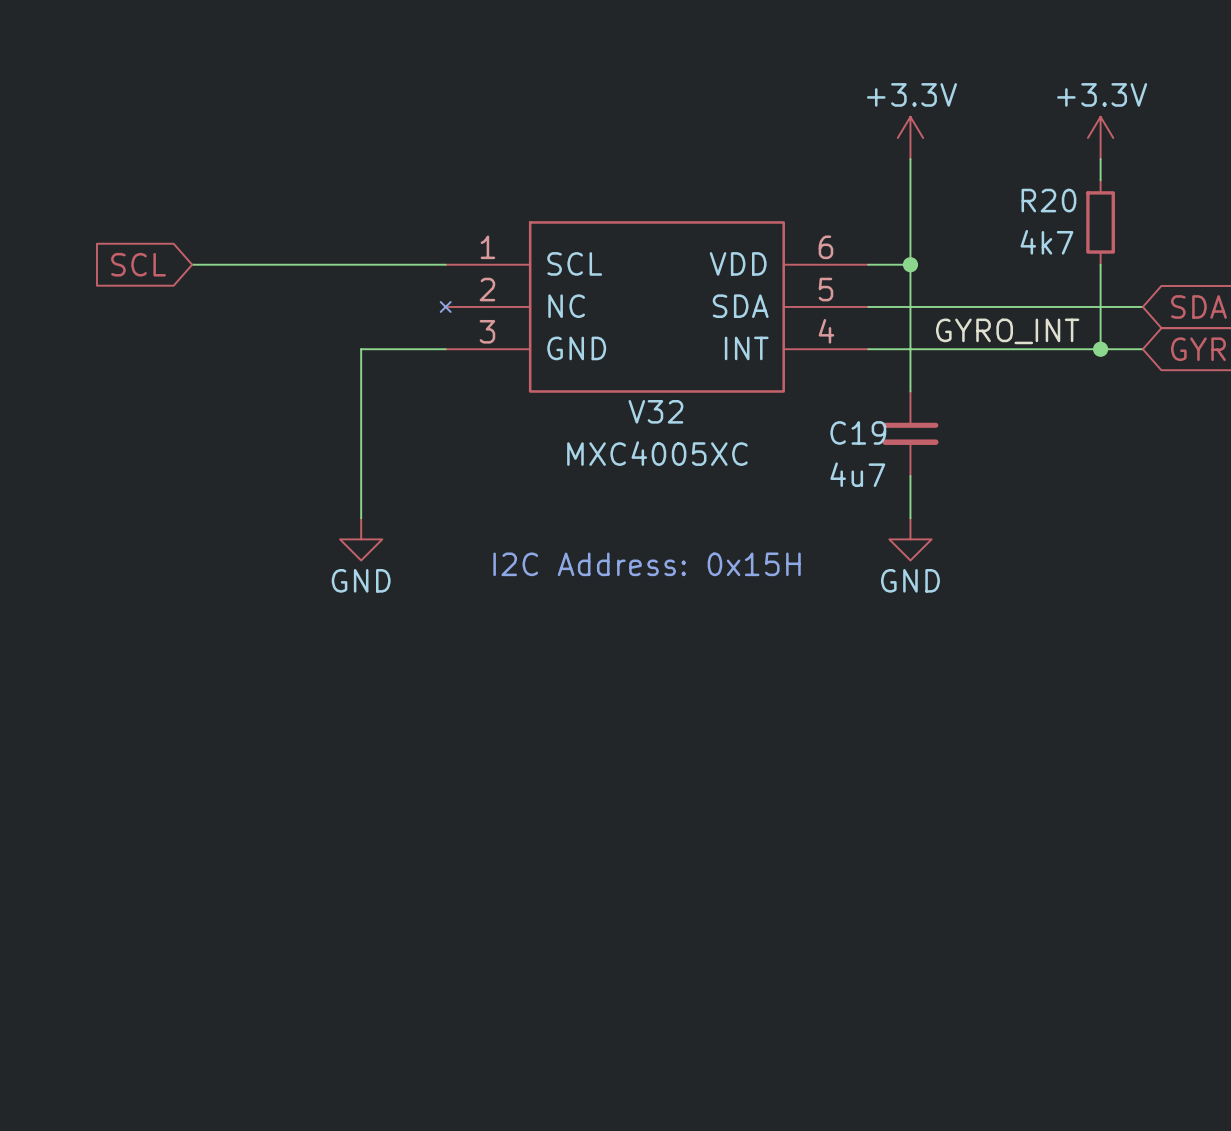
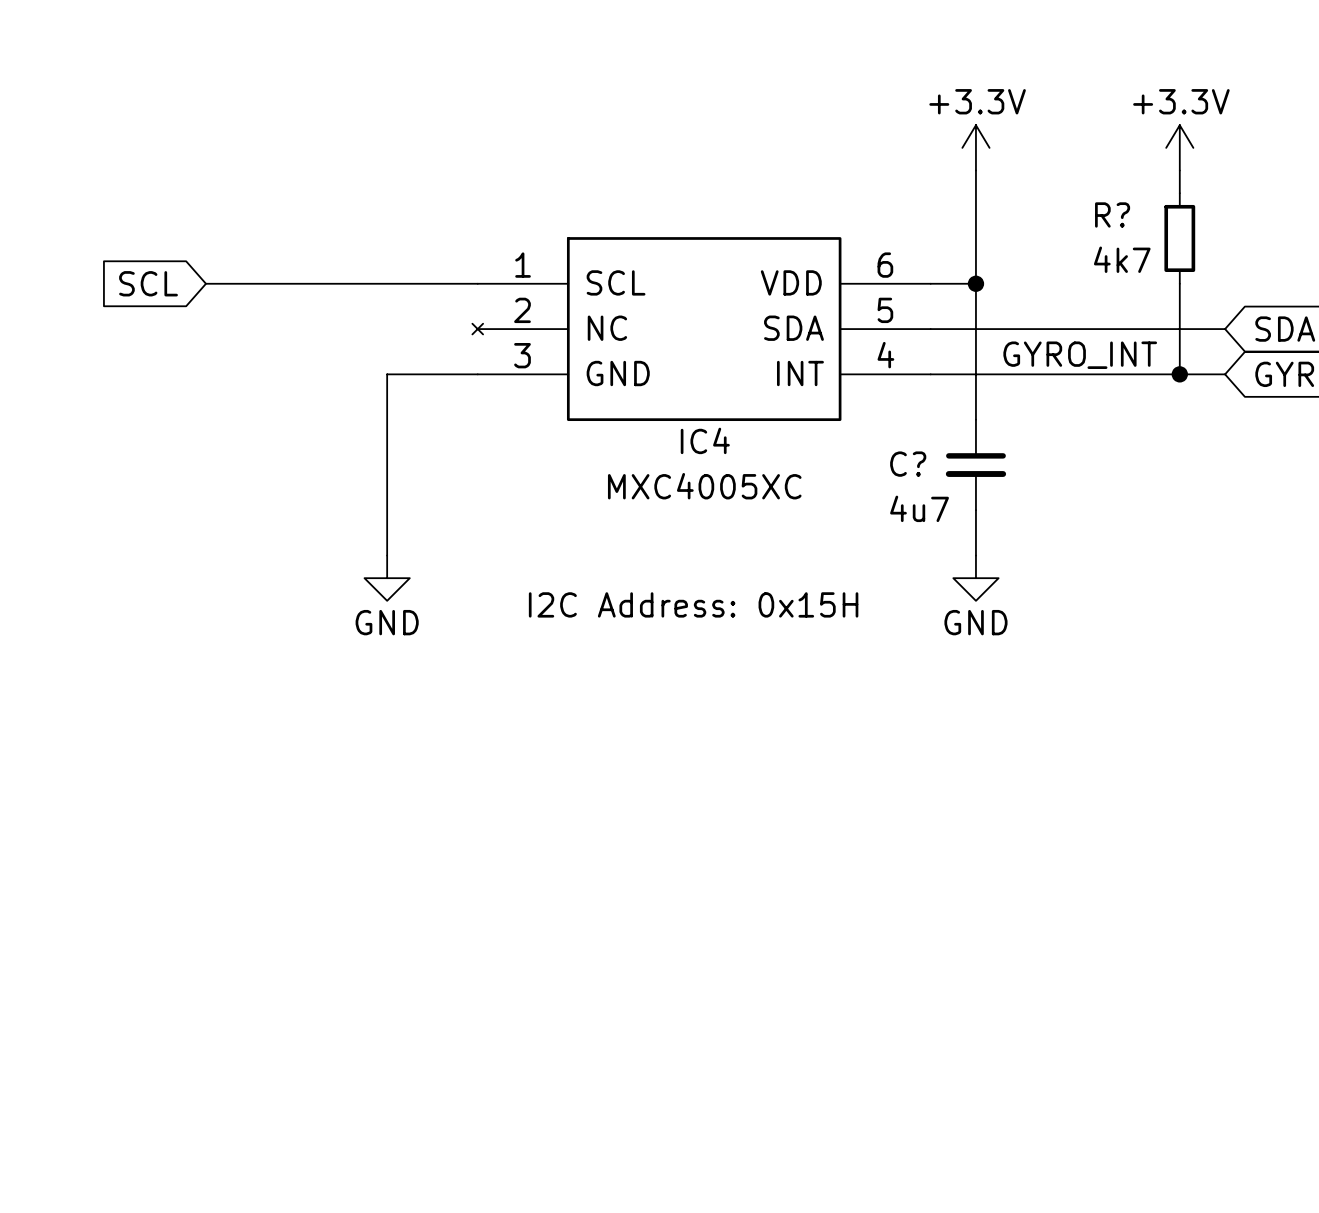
R20 name: R20 (1048, 200) -> R? (1112, 214)
V32 name: V32 (655, 411) -> IC4 (705, 440)
C19 name: C19 (858, 432) -> C? (908, 464)

